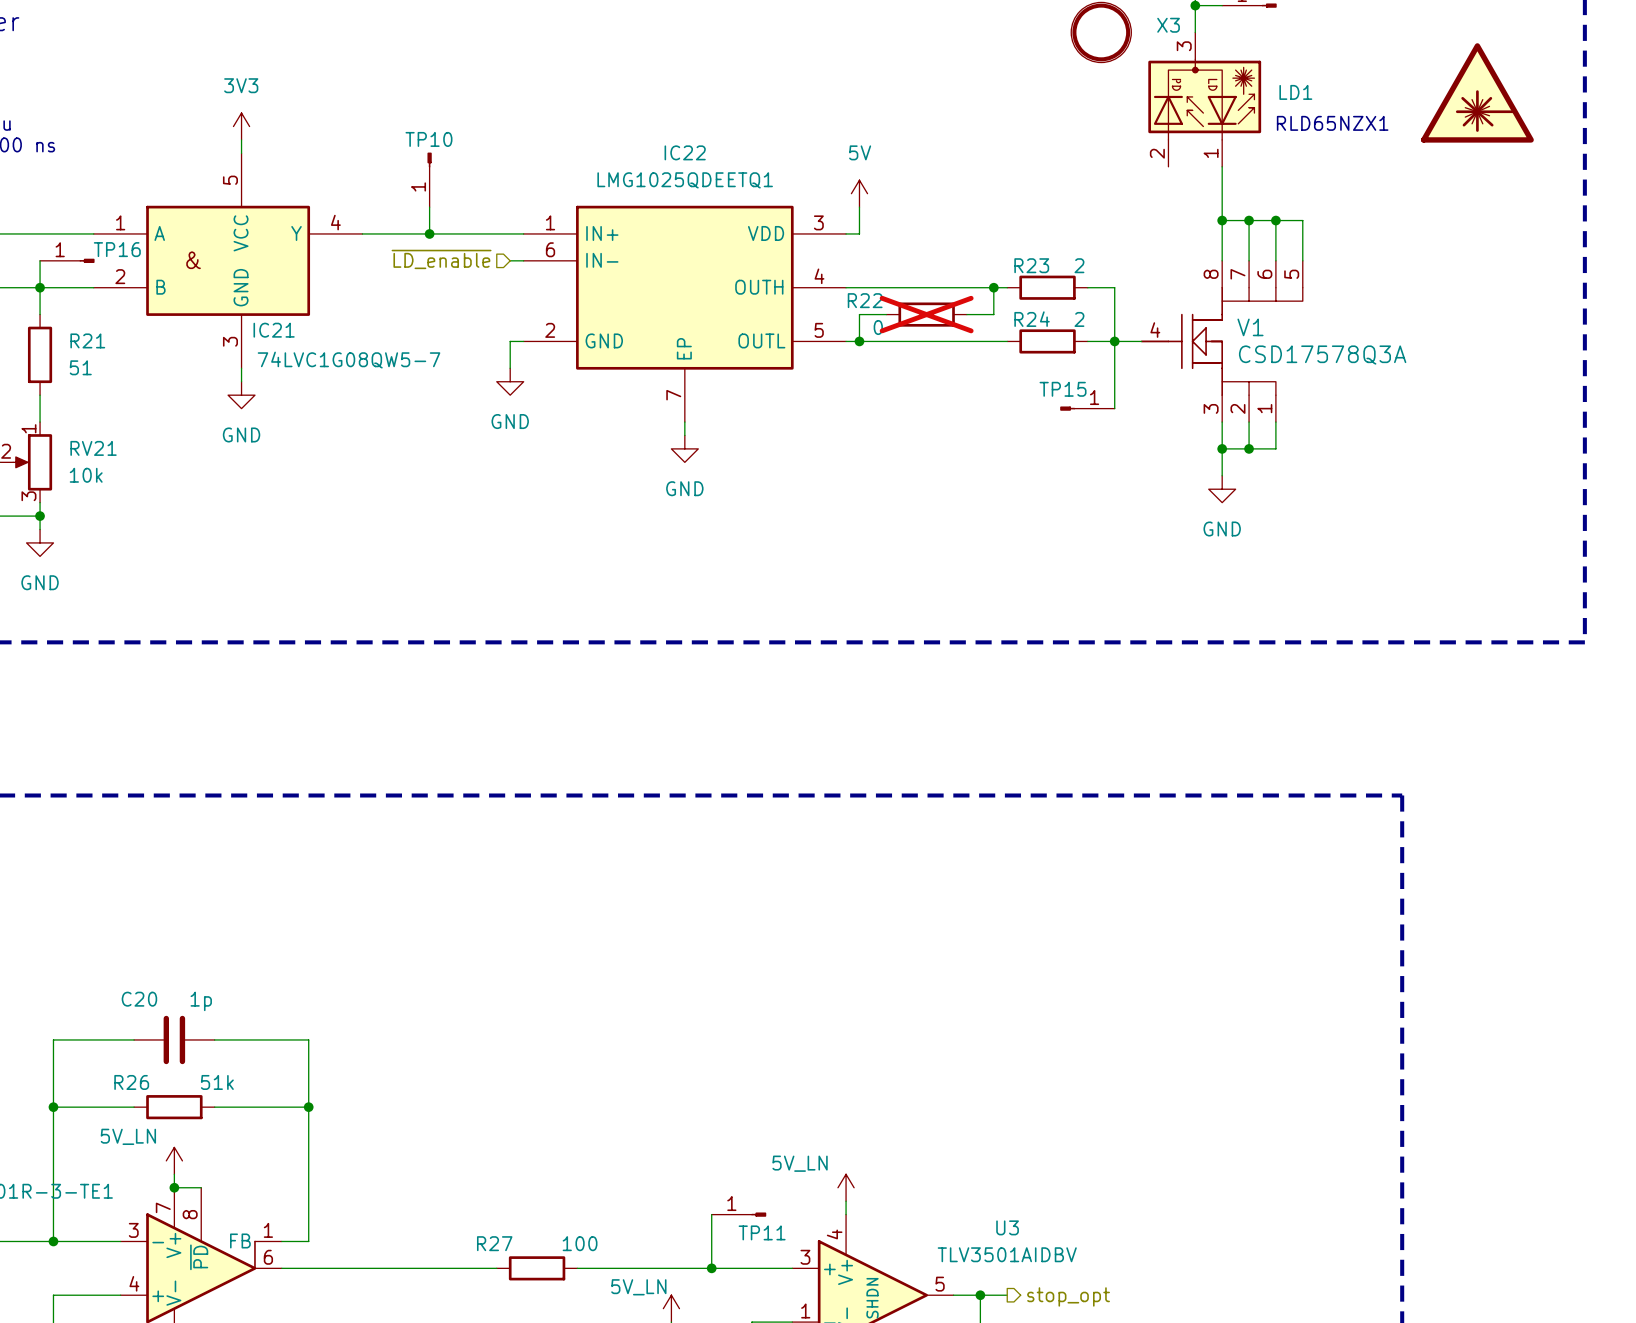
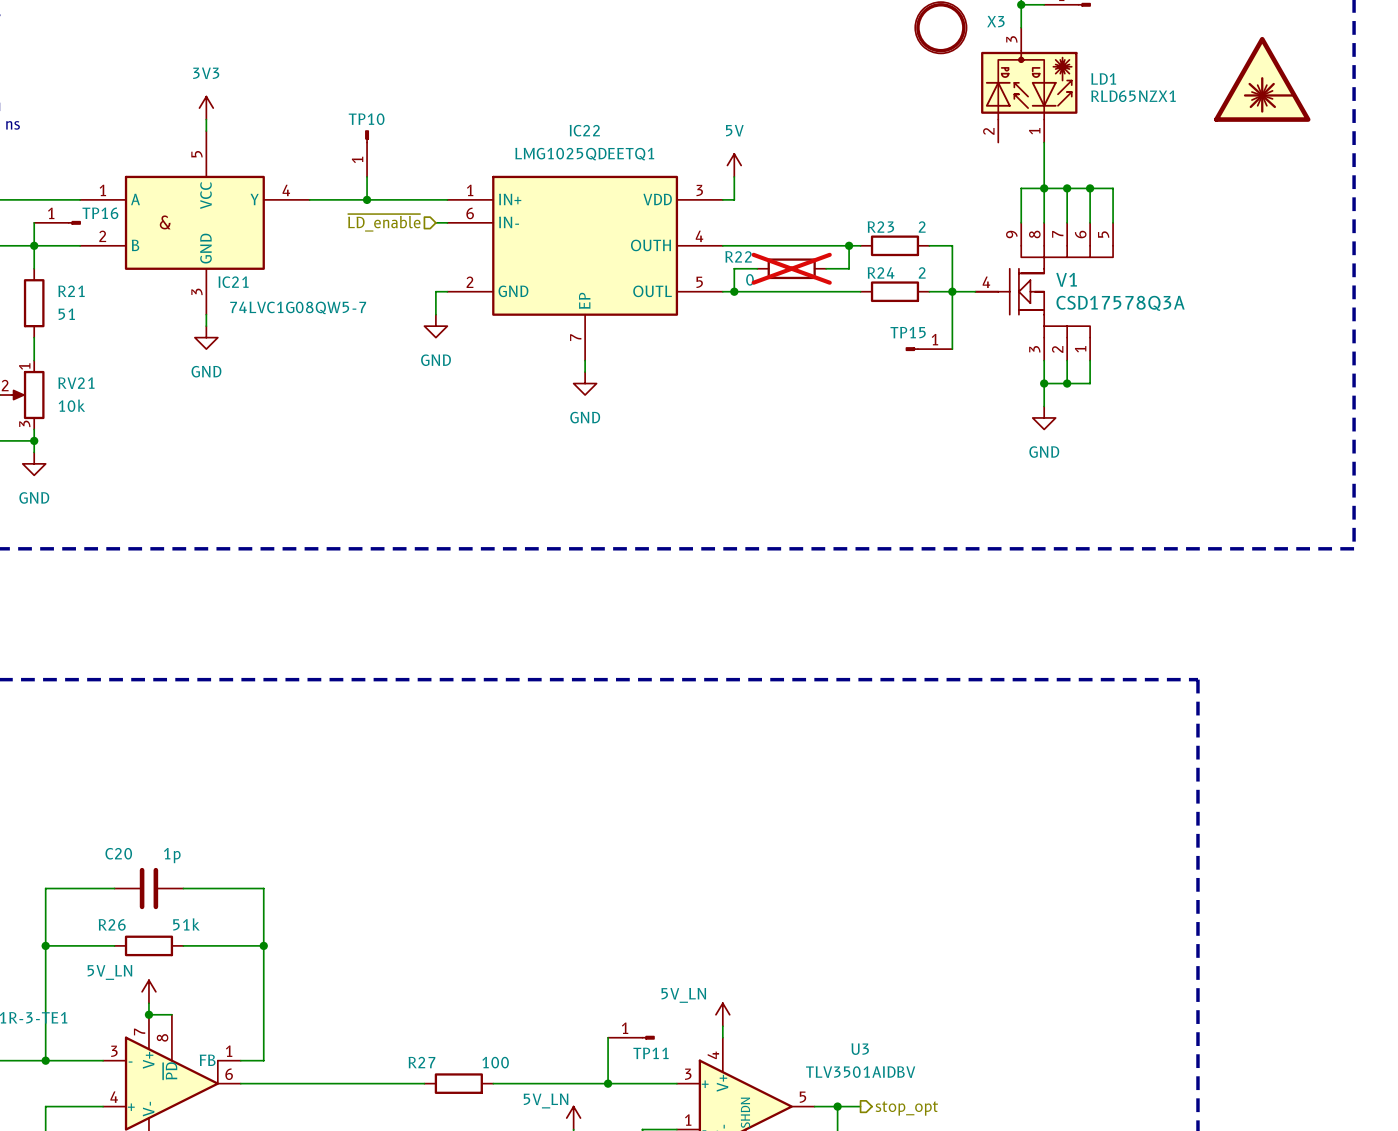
LD1 value: none -> RLD65NZX1 (1133, 96)
text: RLD65NZX1 (1332, 123) -> none
wire: none -> (1044, 188) (1021, 188) (1021, 222)
V1 symbol: [1140, 260, 1303, 423] -> [974, 222, 1114, 361]

